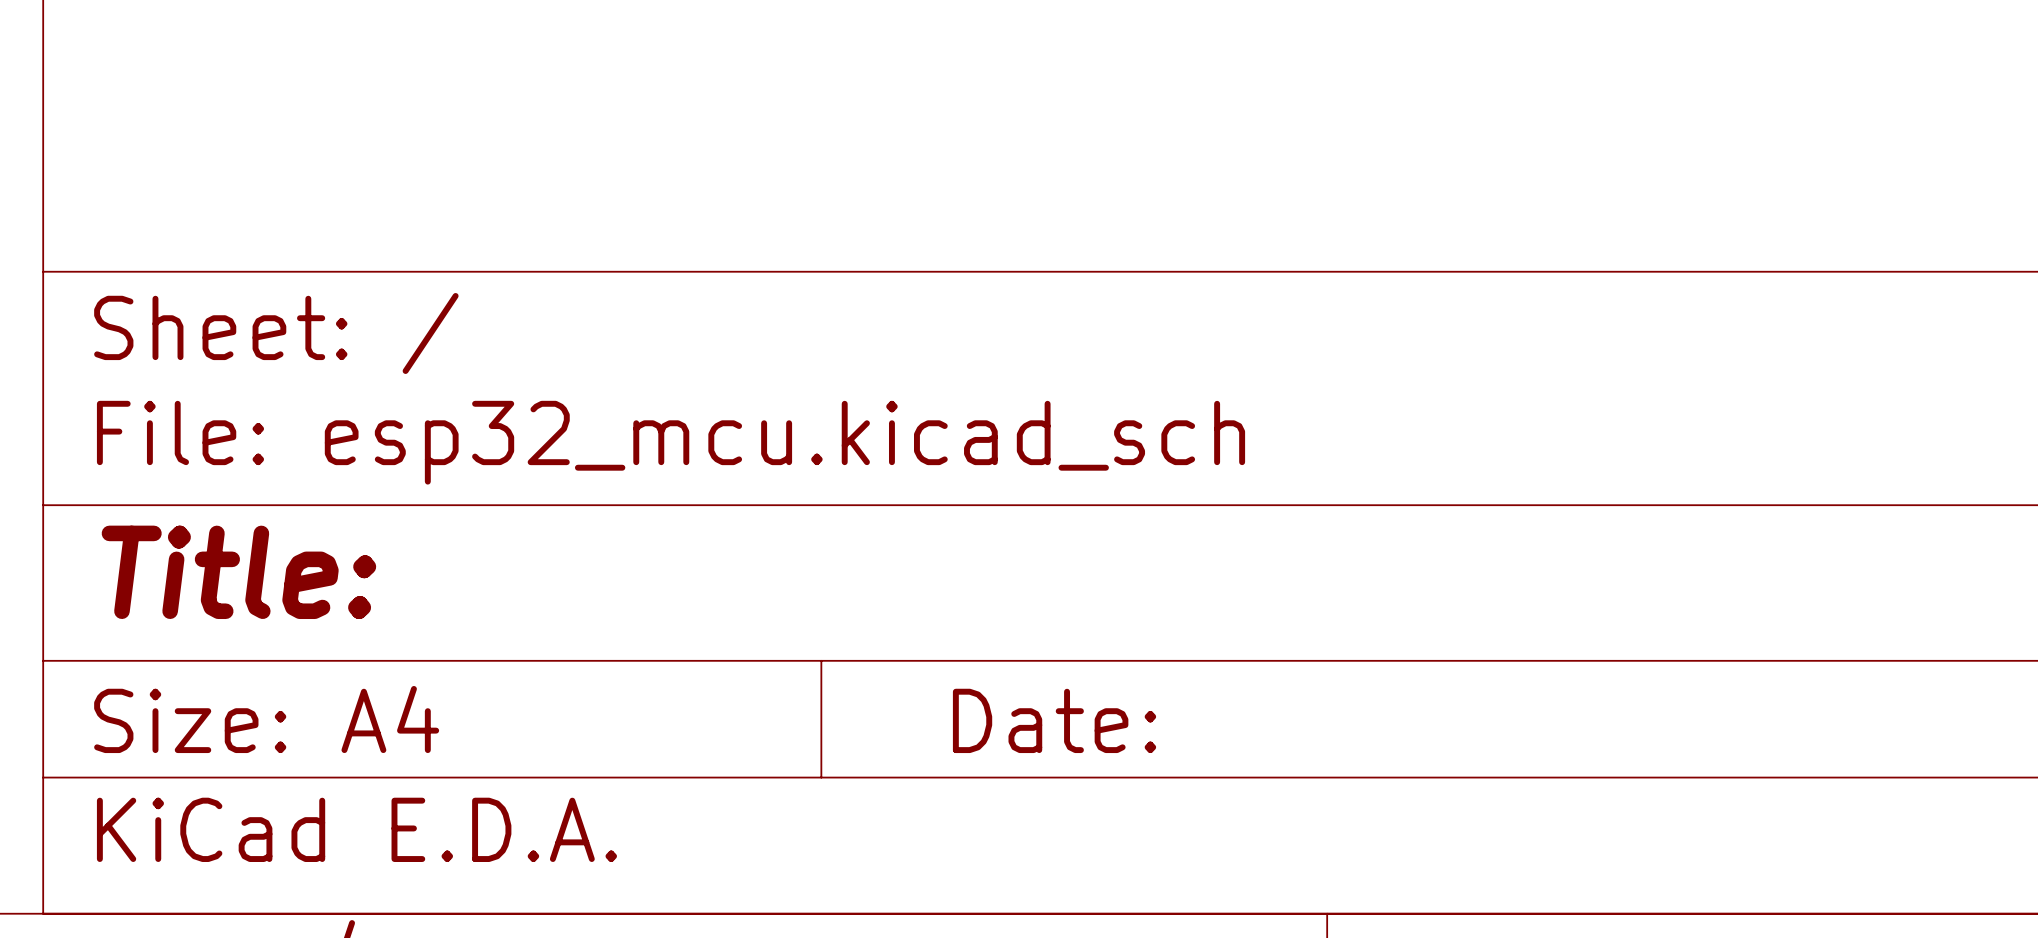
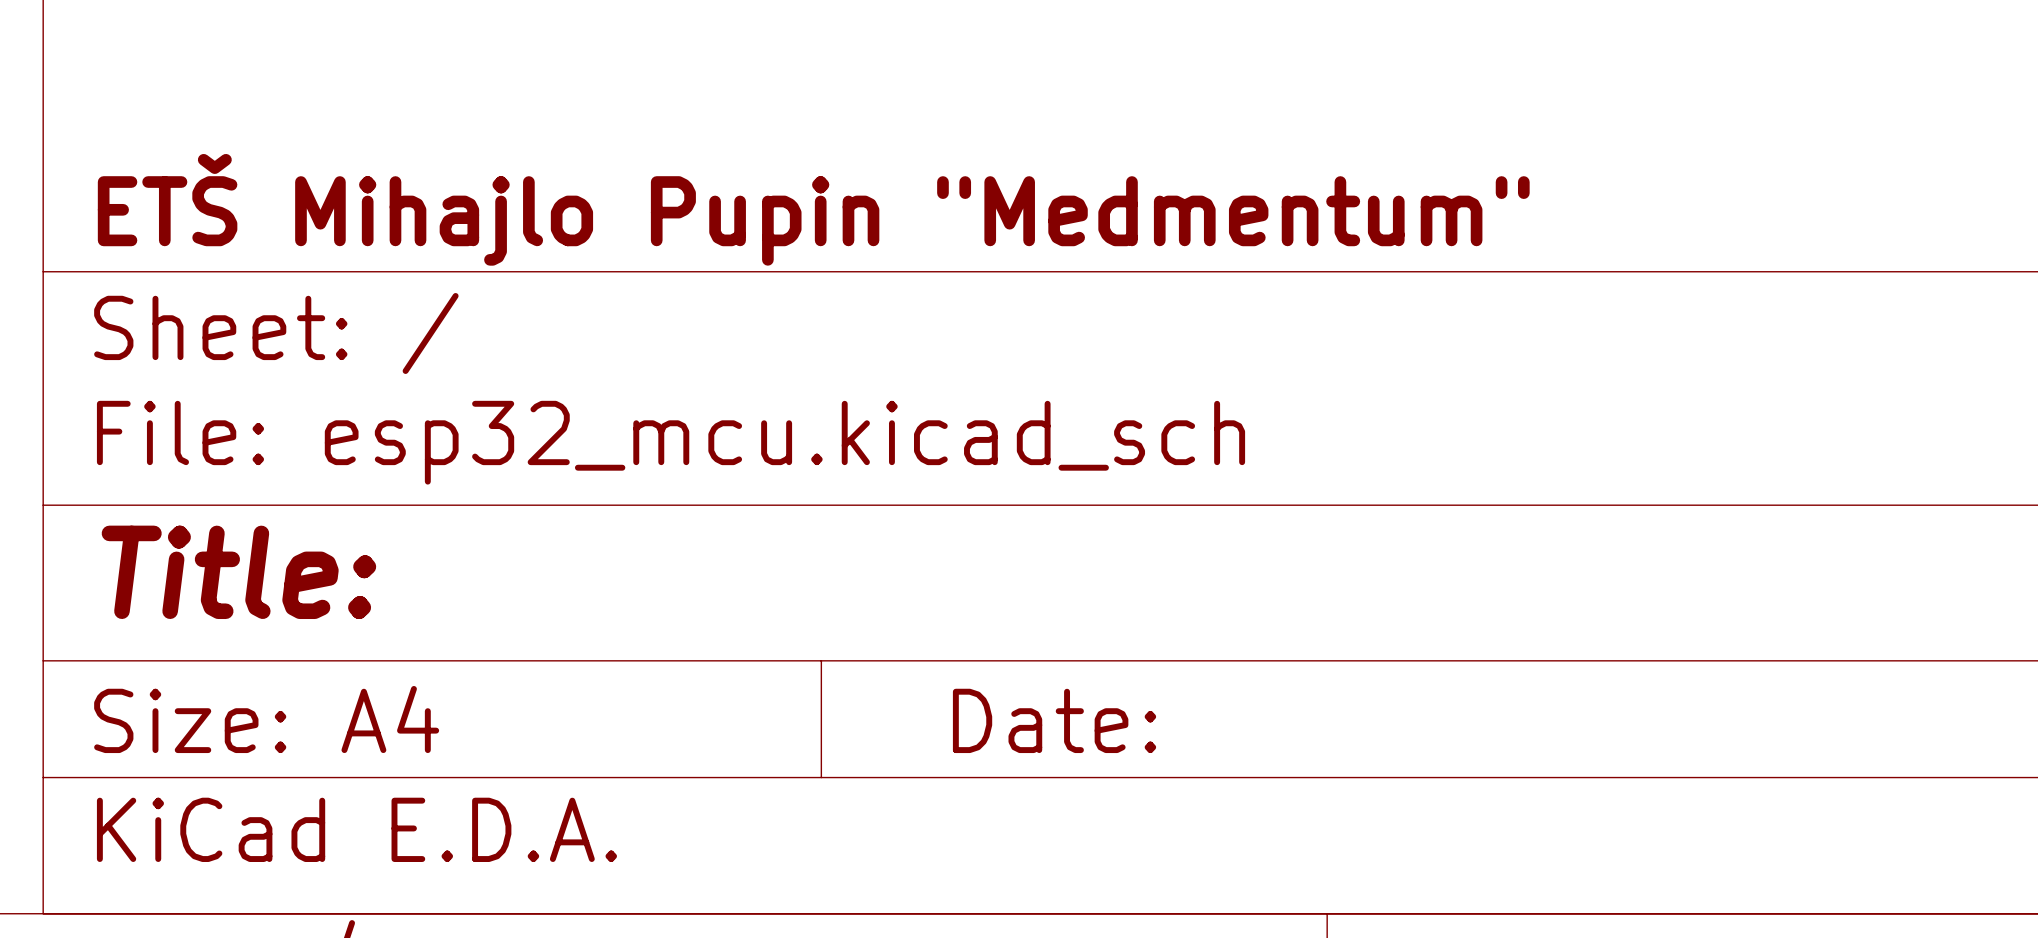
title block: none -> ETŠ Mihajlo Pupin "Medmentum" (813, 209)

